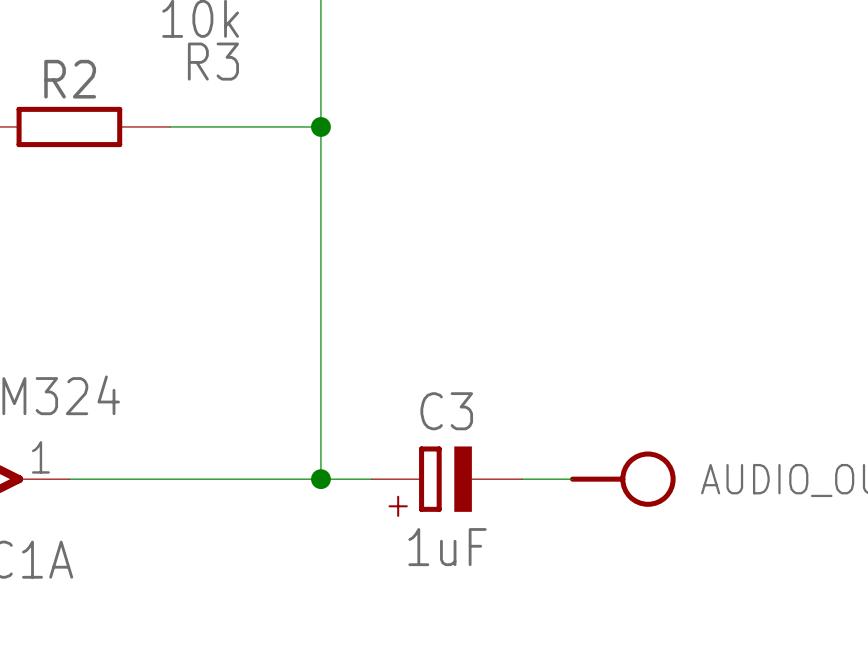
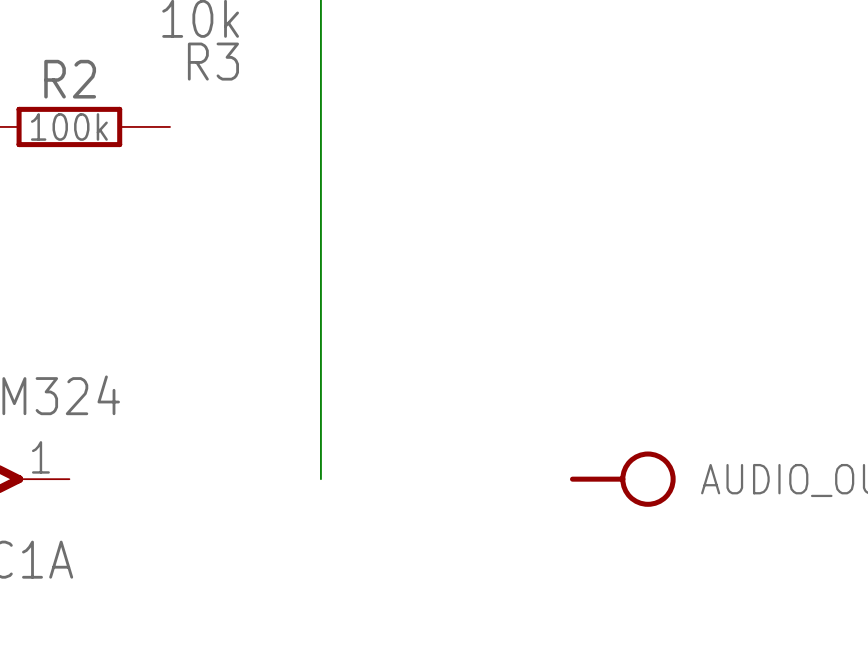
R2 value: none -> 100k (69, 126)
wire: (170, 126) (320, 126) -> none
junction: (320, 126) -> none
wire: (69, 479) (371, 479) -> none
junction: (320, 479) -> none
C3: 1uF (446, 479) -> none
wire: (522, 479) (572, 479) -> none

